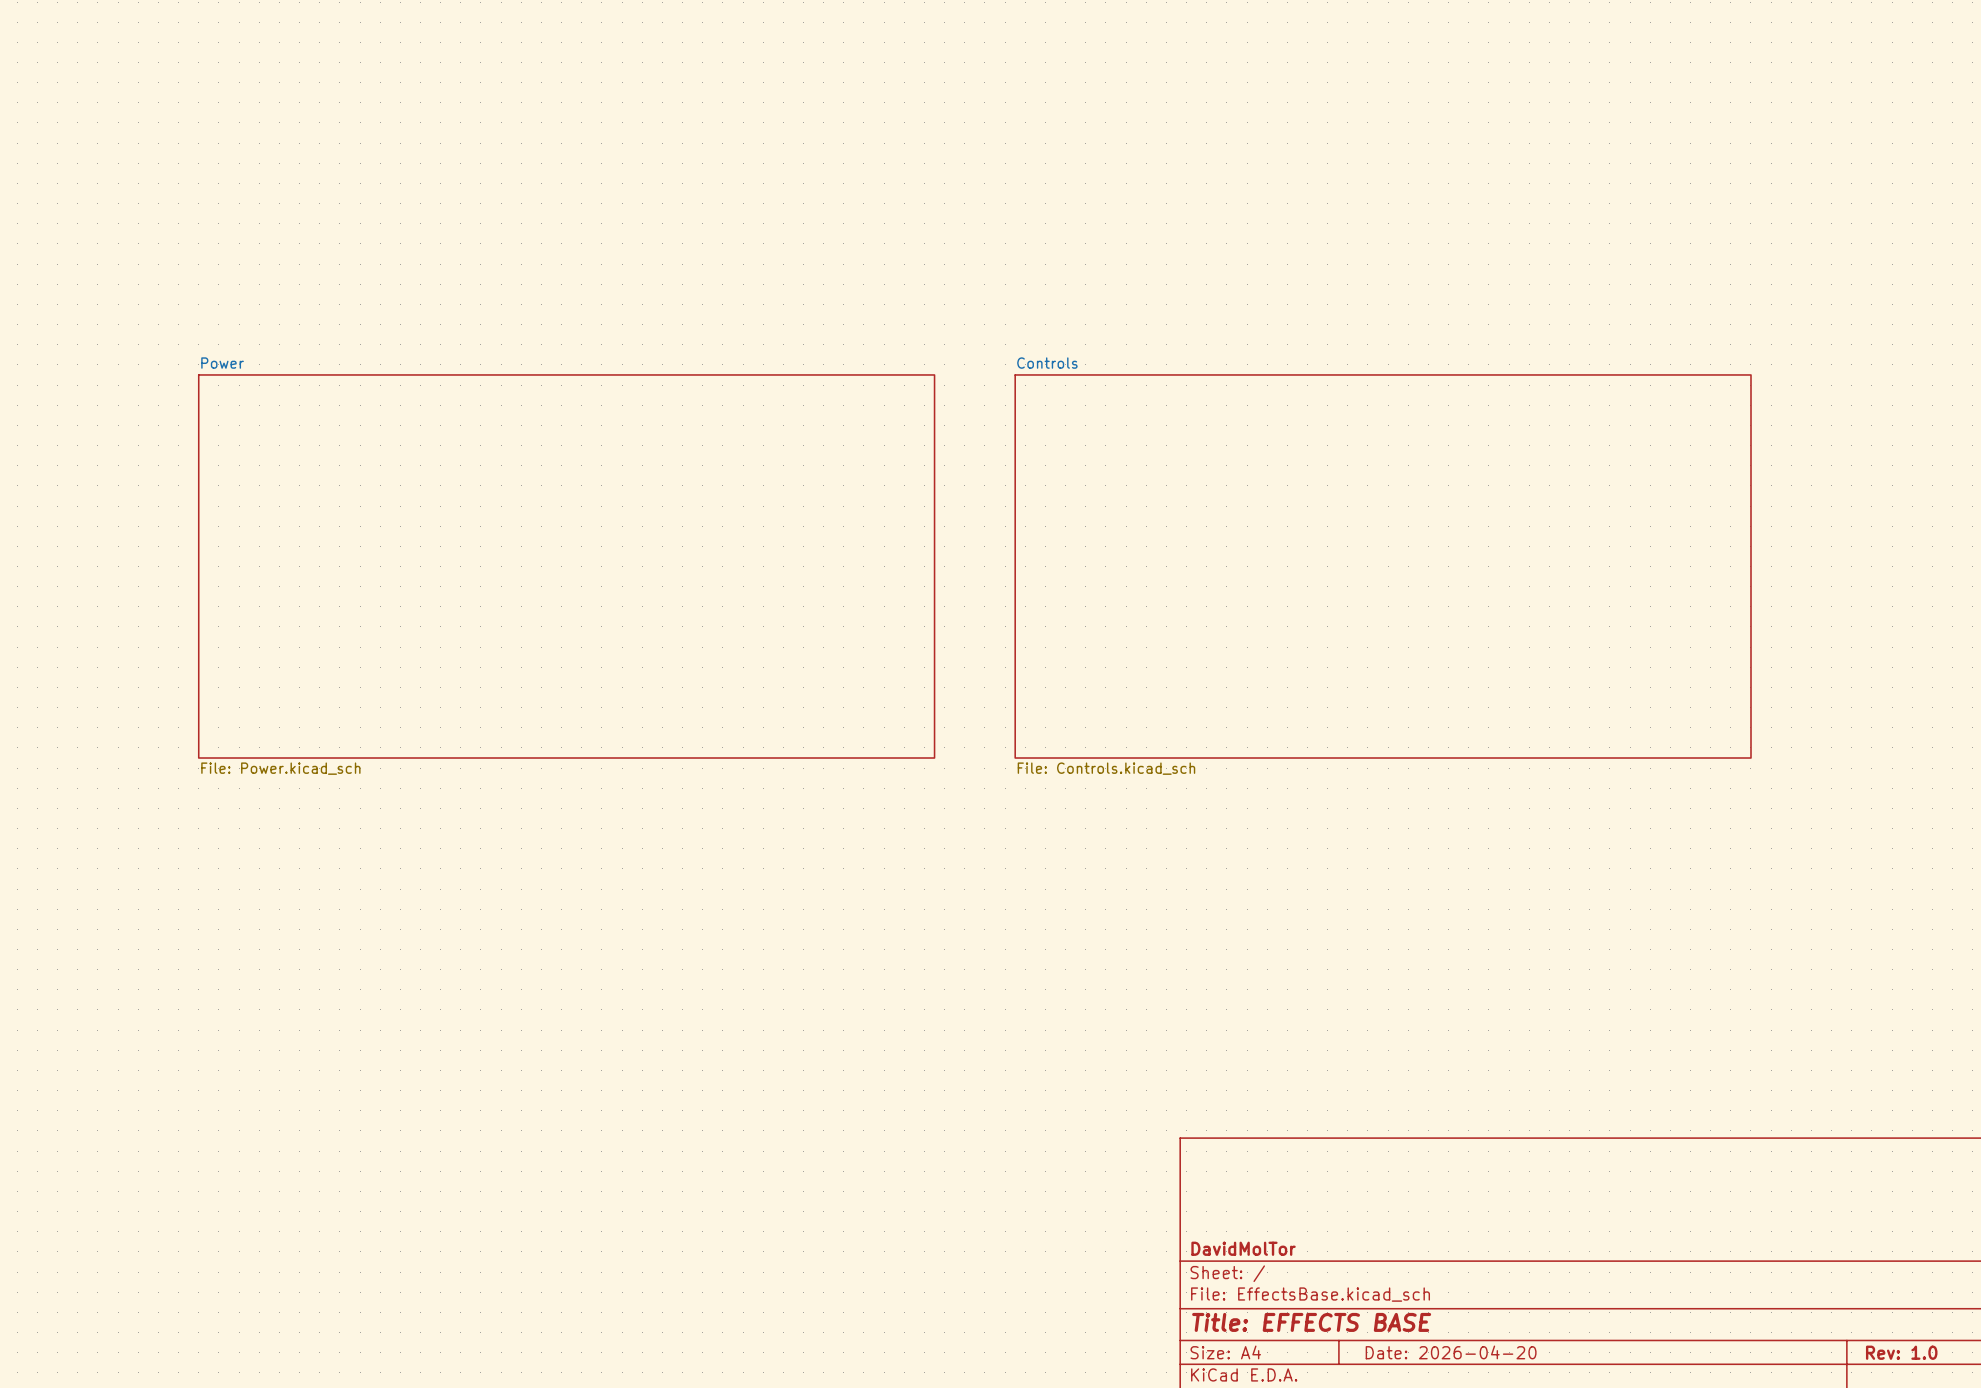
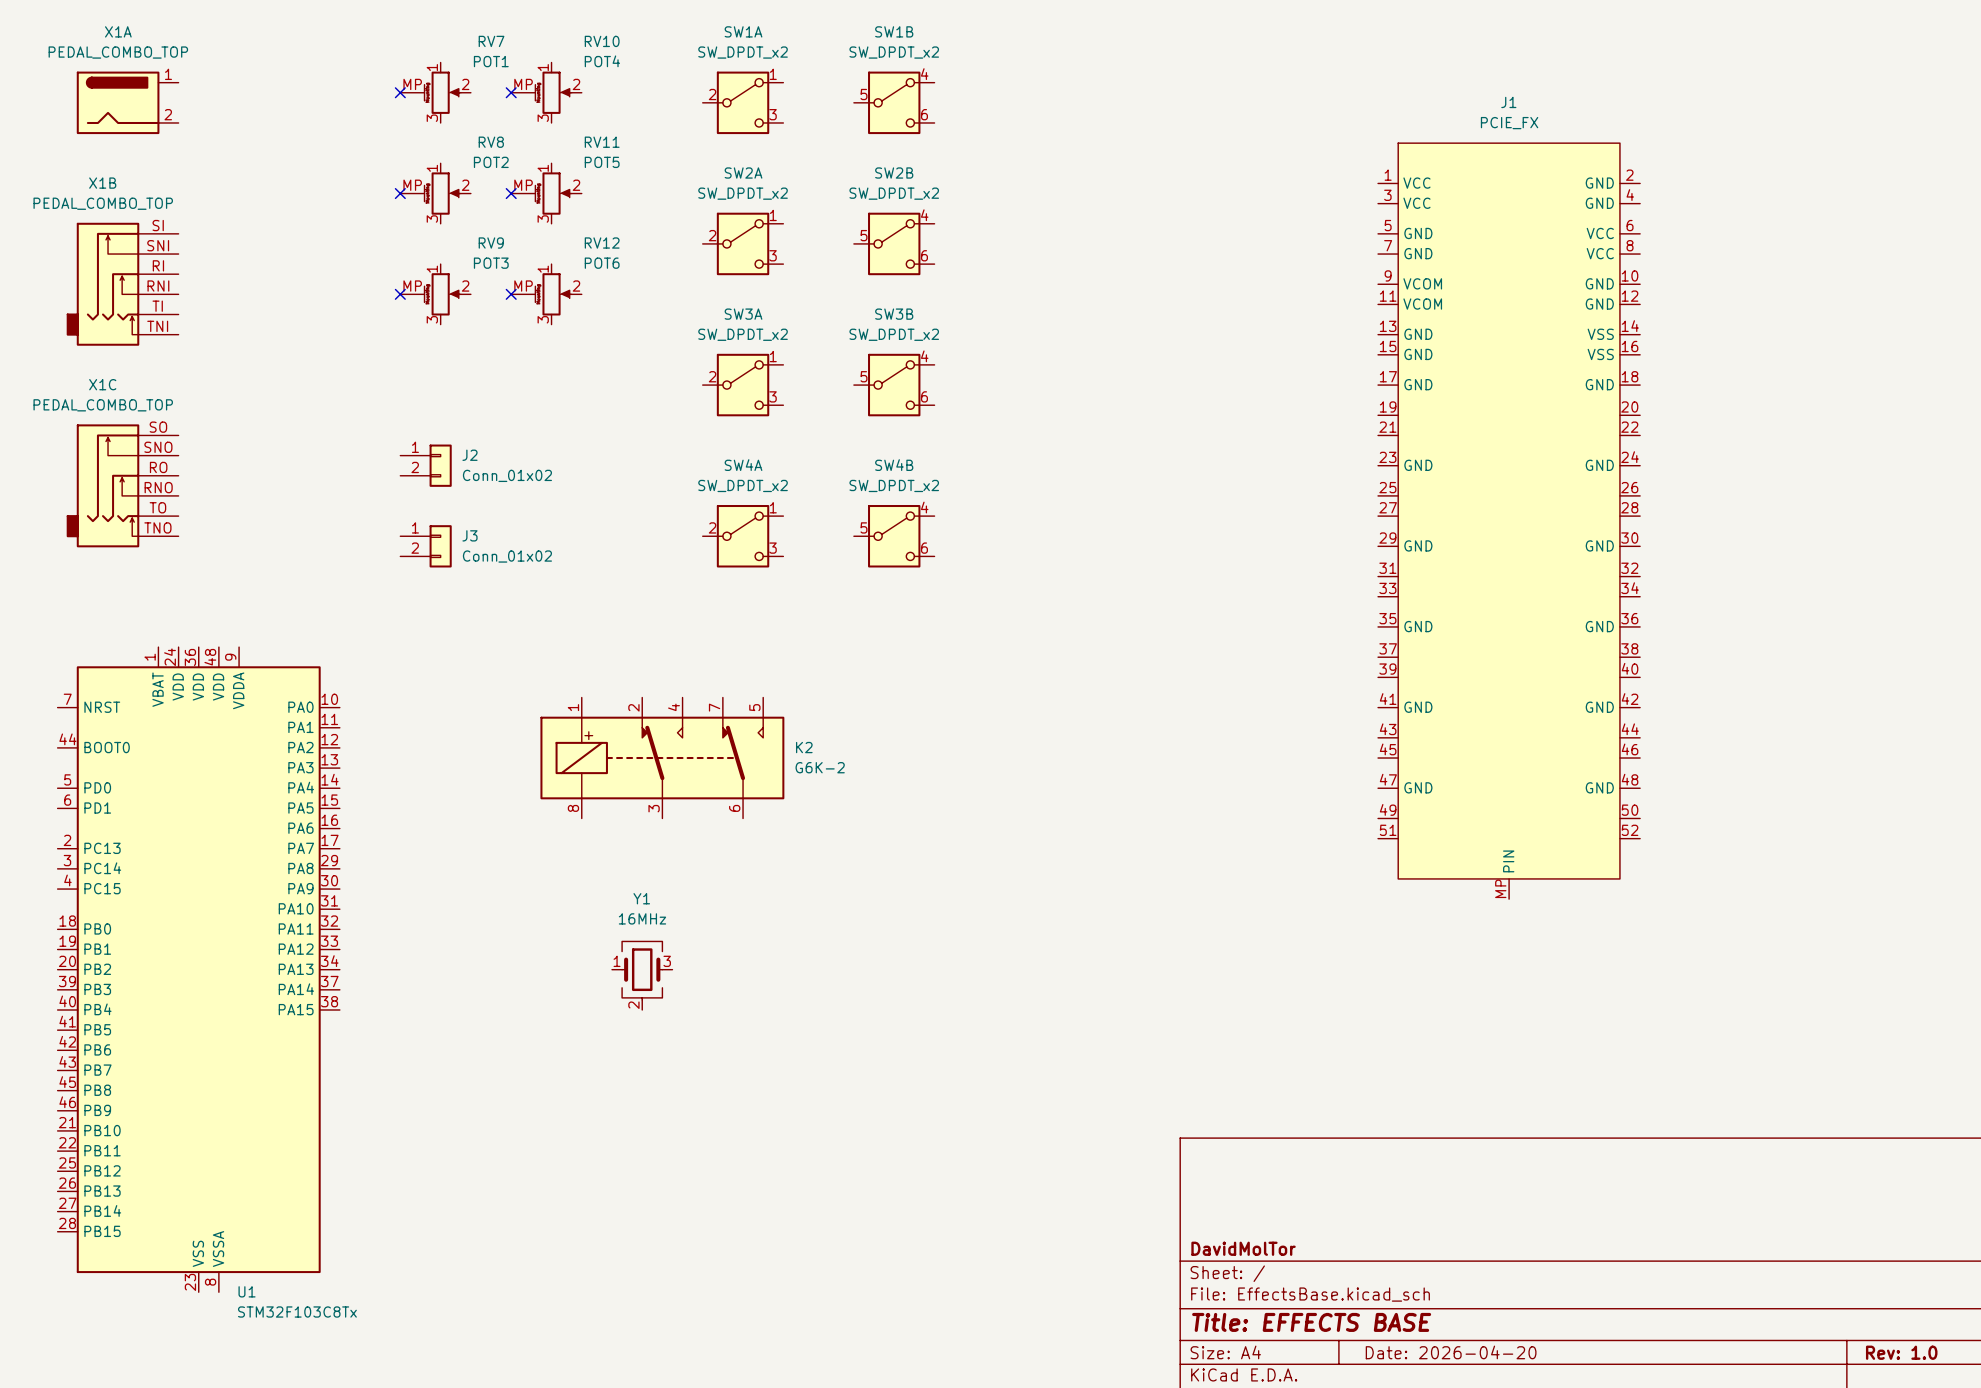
no-connect mark: none -> (400, 92)
RV7: none -> POT1 (435, 92)
no-connect mark: none -> (511, 92)
RV10: none -> POT4 (546, 92)
X1A: none -> PEDAL_COMBO_TOP (127, 102)
SW1A: none -> SW_DPDT_x2 (743, 102)
SW1B: none -> SW_DPDT_x2 (894, 102)
no-connect mark: none -> (400, 193)
RV8: none -> POT2 (435, 193)
no-connect mark: none -> (511, 193)
RV11: none -> POT5 (546, 193)
SW2A: none -> SW_DPDT_x2 (743, 243)
SW2B: none -> SW_DPDT_x2 (894, 243)
X1B: none -> PEDAL_COMBO_TOP (122, 284)
no-connect mark: none -> (400, 294)
RV9: none -> POT3 (435, 294)
no-connect mark: none -> (511, 294)
RV12: none -> POT6 (546, 294)
SW3A: none -> SW_DPDT_x2 (743, 385)
SW3B: none -> SW_DPDT_x2 (894, 385)
J2: none -> Conn_01x02 (426, 465)
X1C: none -> PEDAL_COMBO_TOP (122, 485)
J1: none -> PCIE_FX (1509, 521)
SW4A: none -> SW_DPDT_x2 (743, 536)
SW4B: none -> SW_DPDT_x2 (894, 536)
J3: none -> Conn_01x02 (426, 546)
sheet Power: File: Power.kicad_sch (566, 566) -> none
sheet Controls: File: Controls.kicad_sch (1383, 566) -> none
K2: none -> G6K-2 (662, 758)
U1: none -> STM32F103C8Tx (198, 969)
Y1: none -> 16MHz (642, 975)

